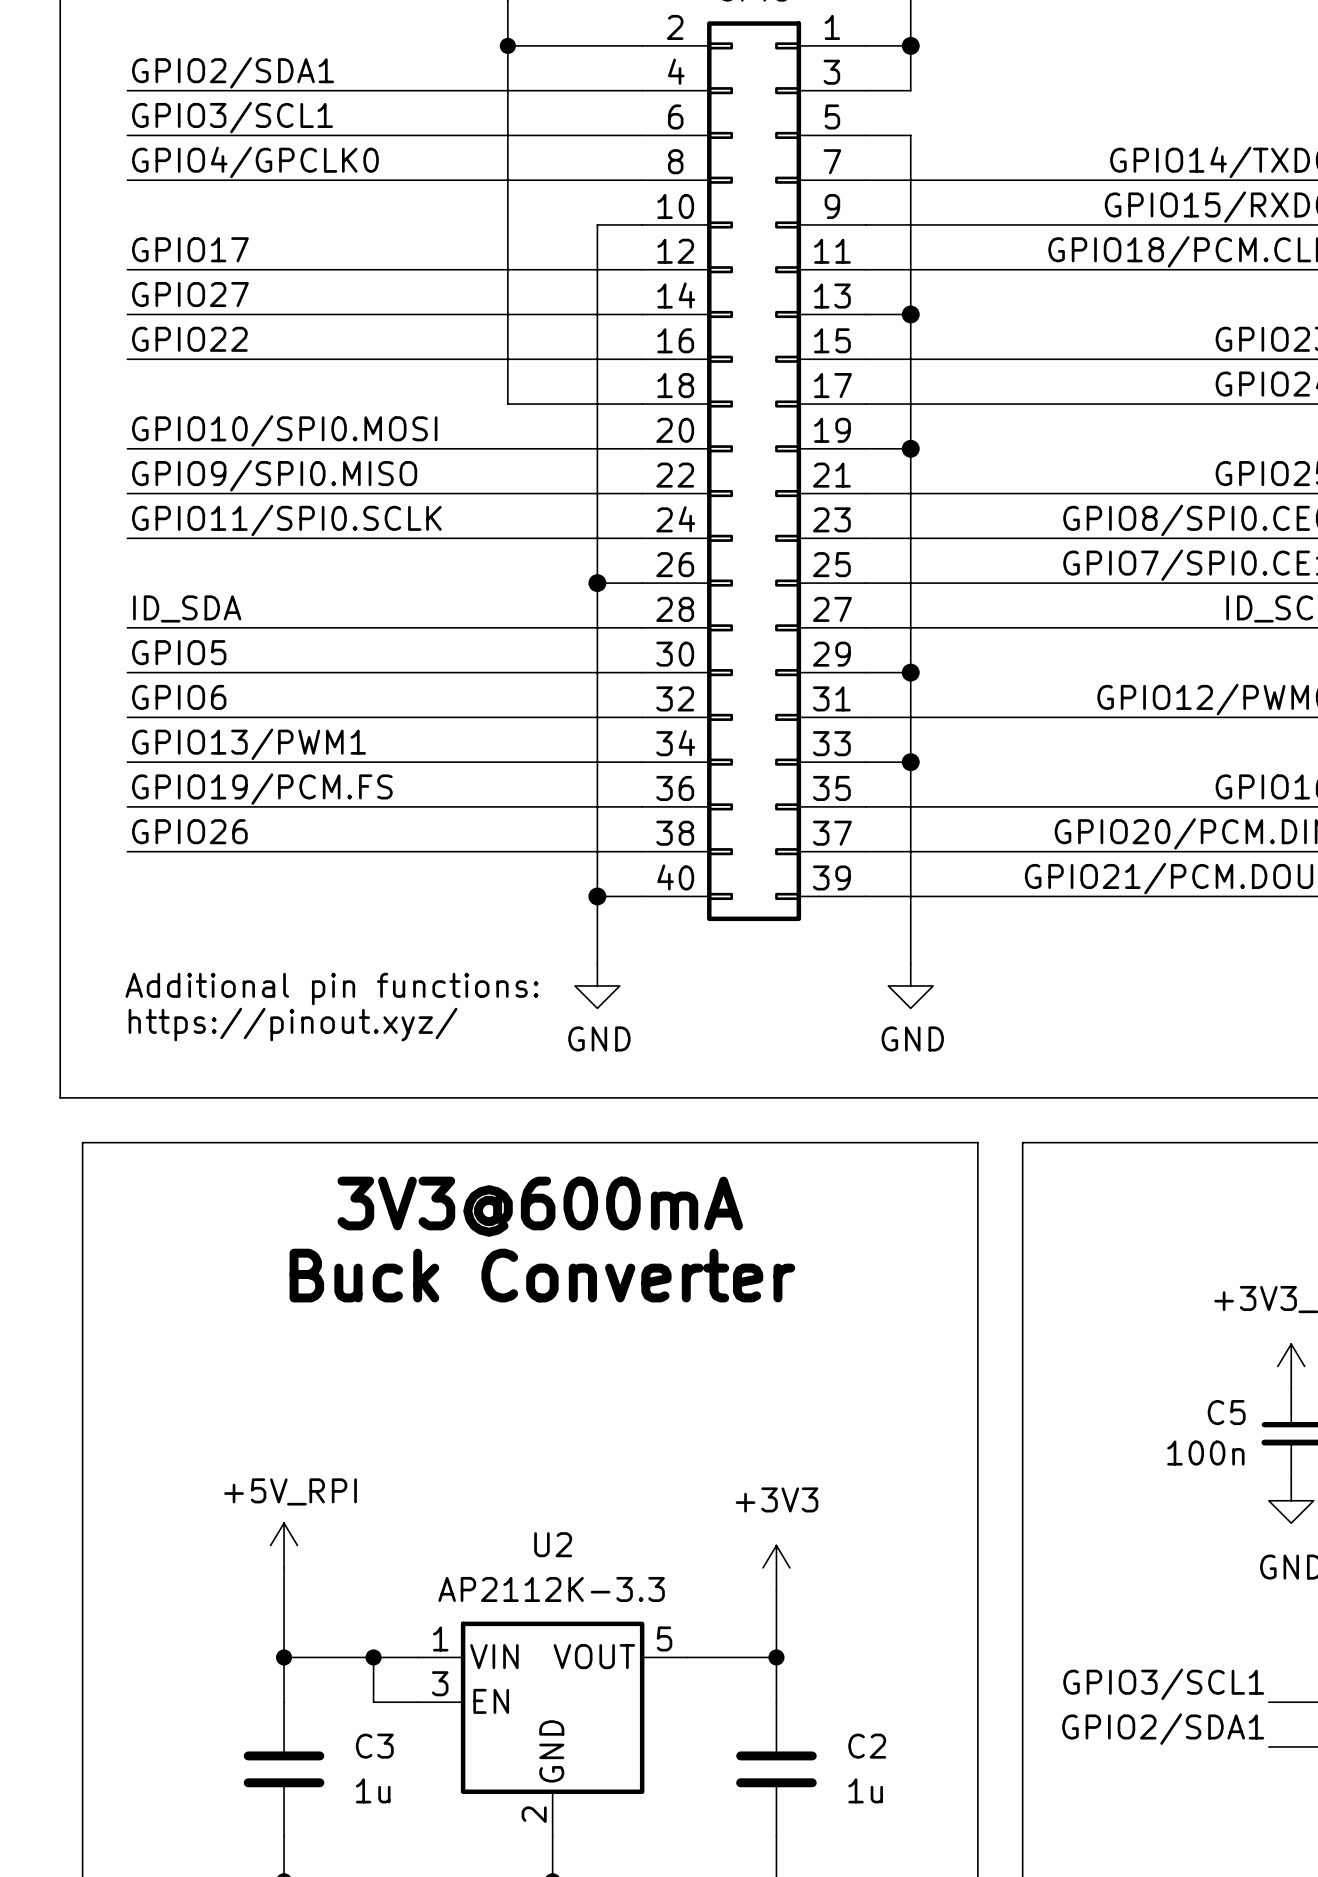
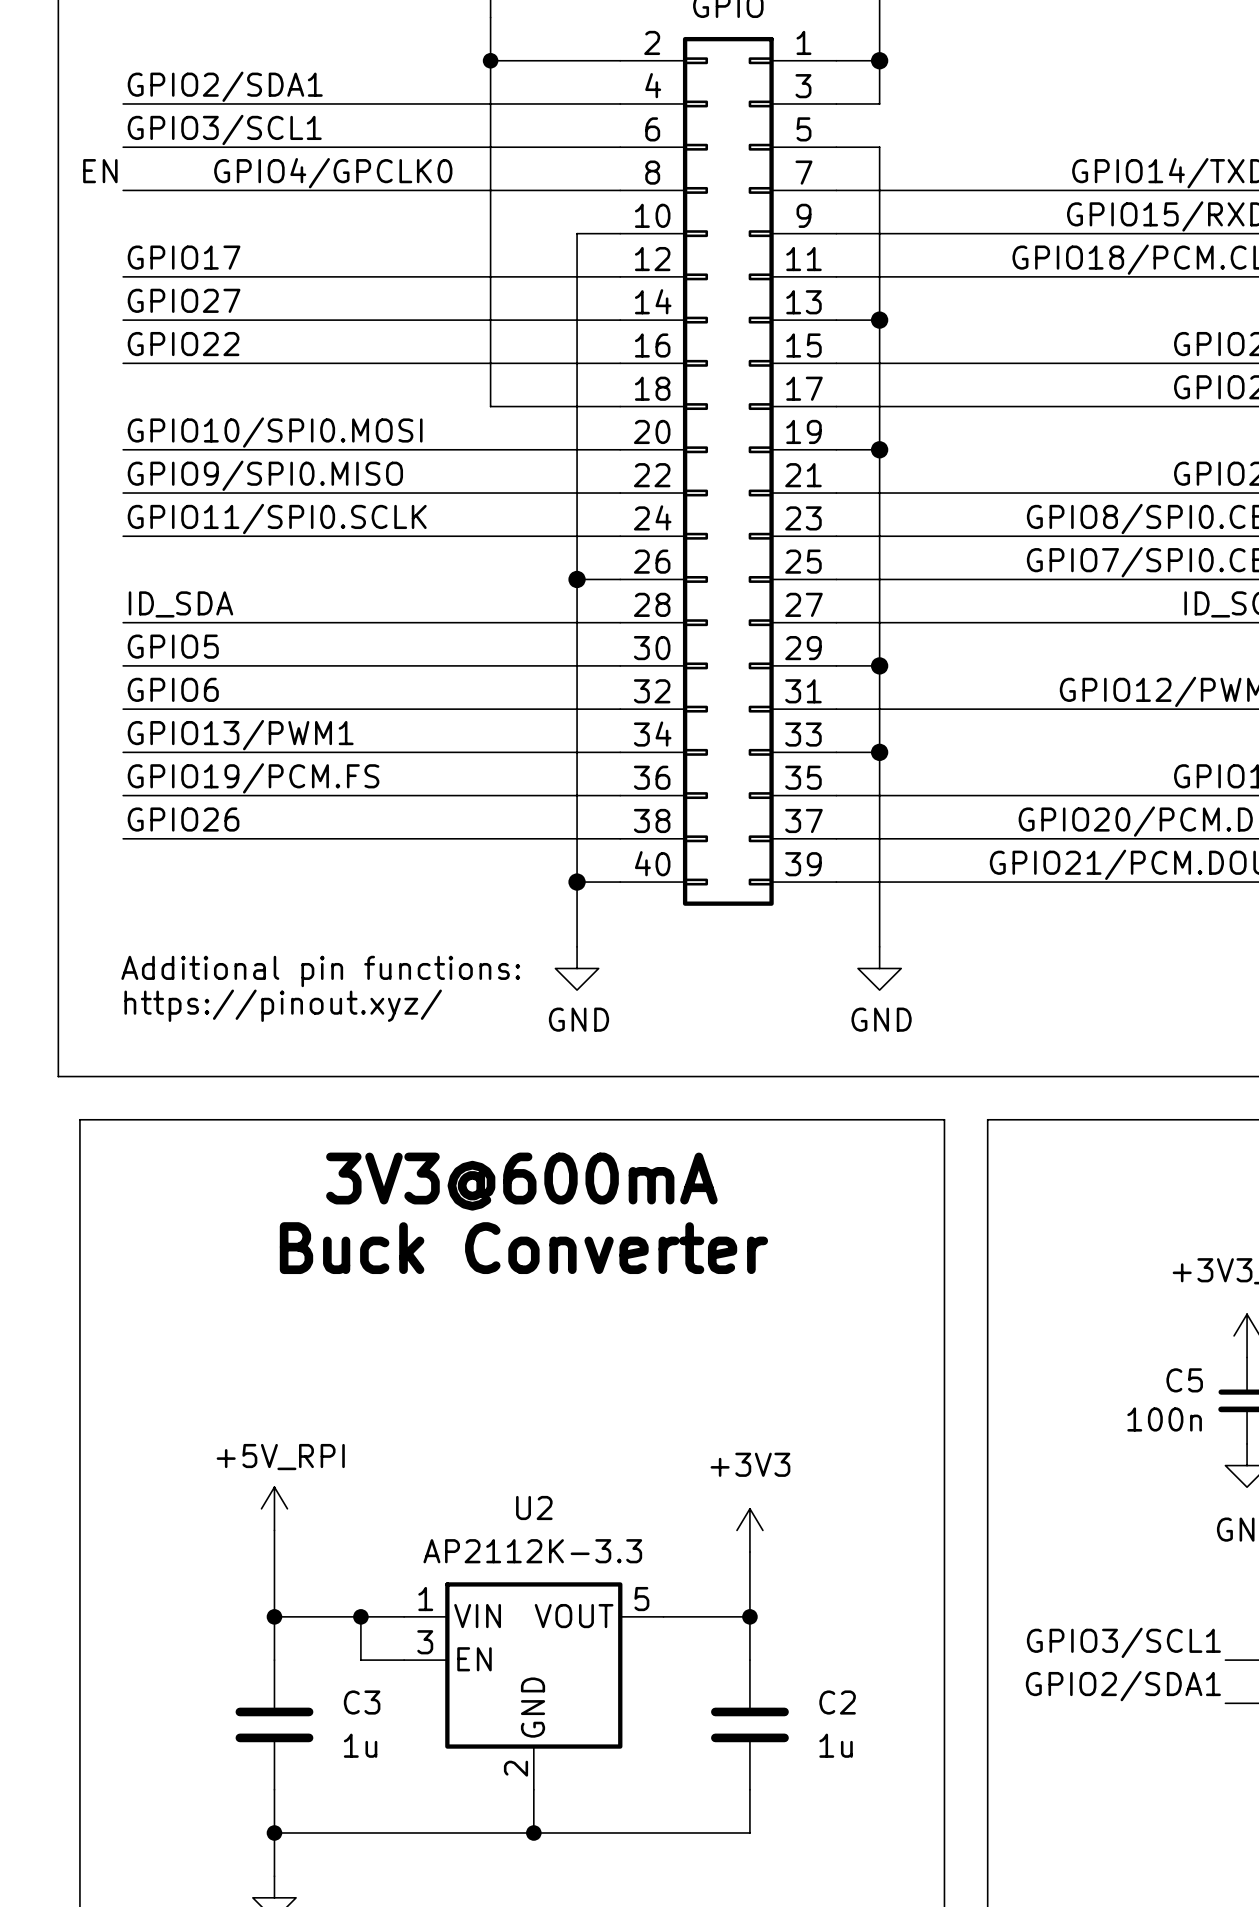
label: GPIO4/GPCLK0 (255, 162) -> EN (100, 171)
label: none -> GPIO4/GPCLK0 (333, 173)

